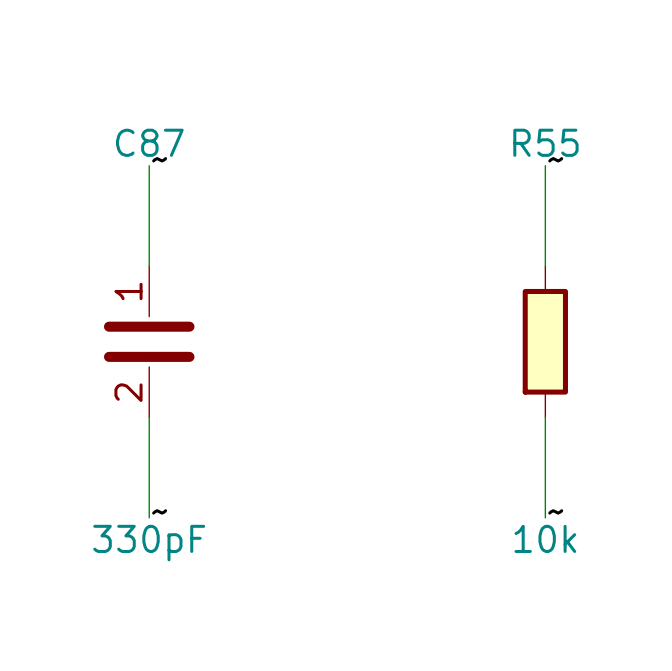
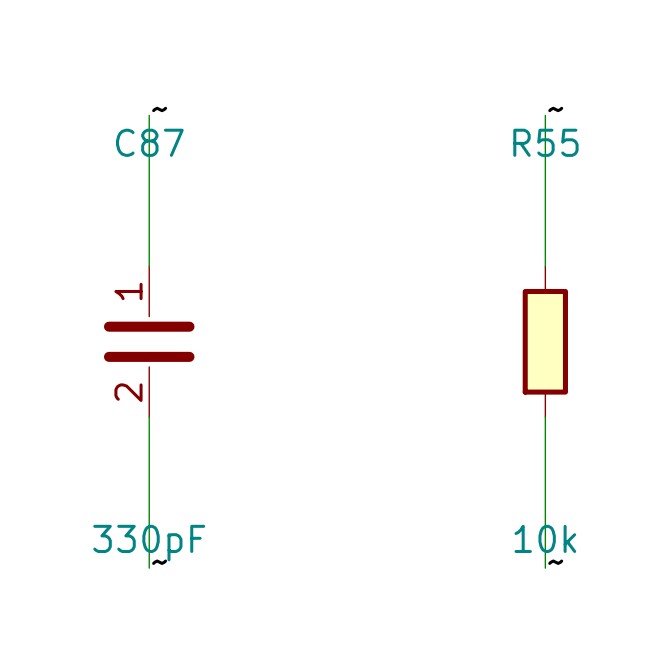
wire: none -> (149, 115) (149, 165)
wire: none -> (545, 115) (545, 165)
label position: ~ (159, 159) -> ~ (159, 109)
label position: ~ (555, 159) -> ~ (555, 109)
label position: ~ (159, 511) -> ~ (159, 562)
label position: ~ (555, 511) -> ~ (555, 562)
wire: none -> (149, 517) (149, 568)
wire: none -> (545, 517) (545, 568)

